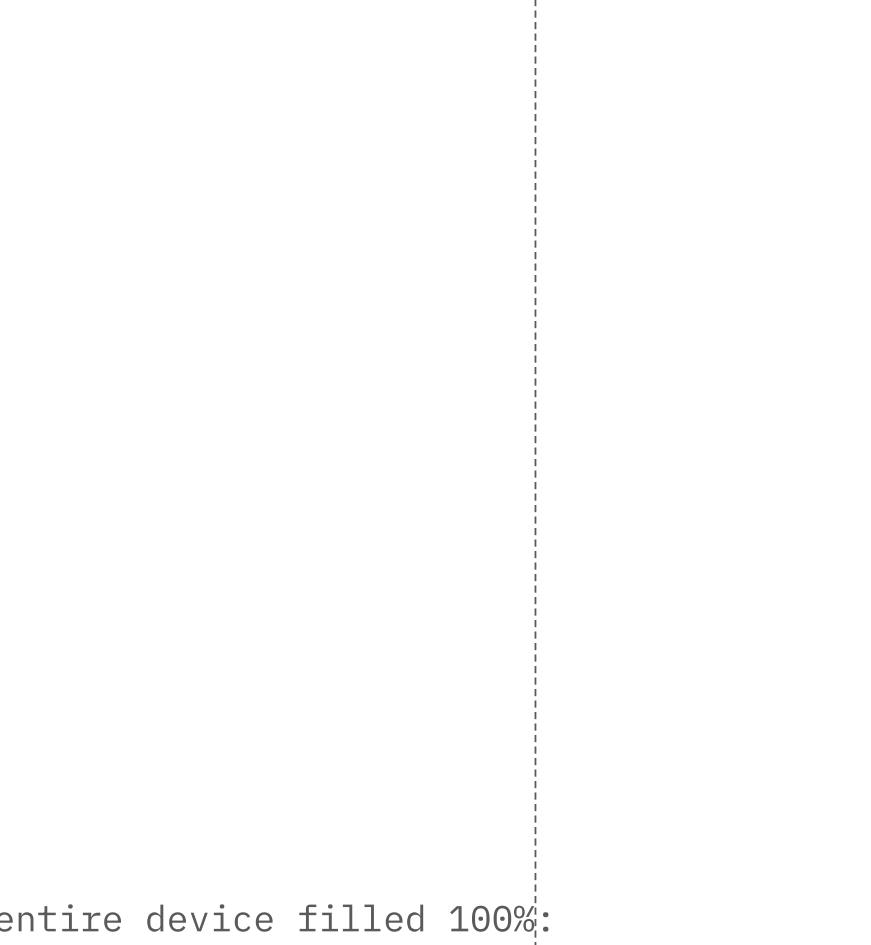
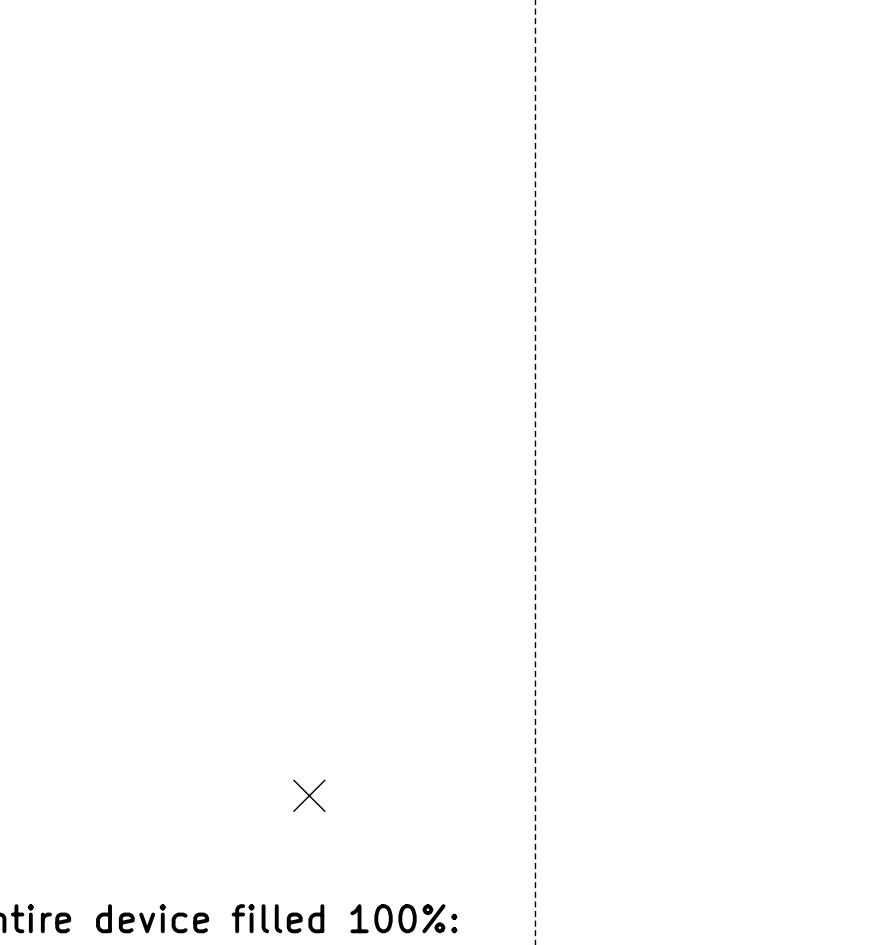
no-connect mark: none -> (309, 795)

